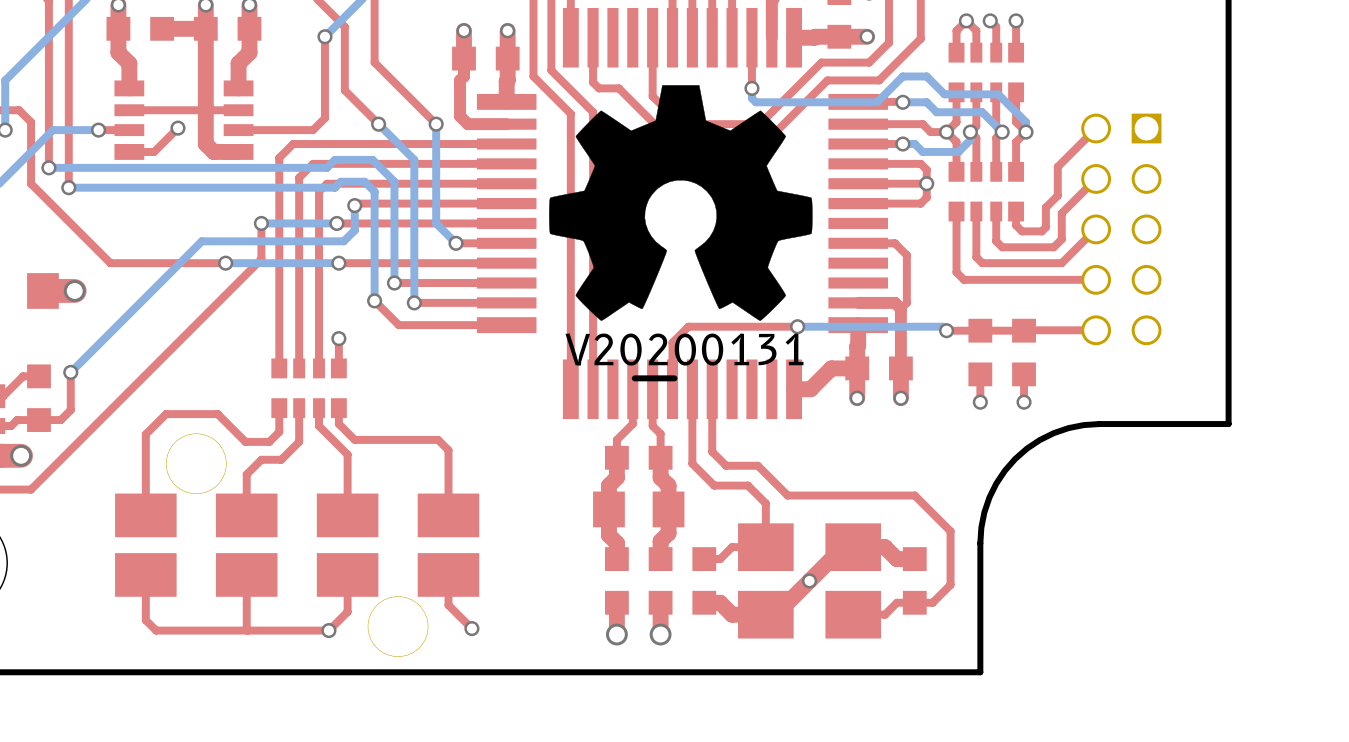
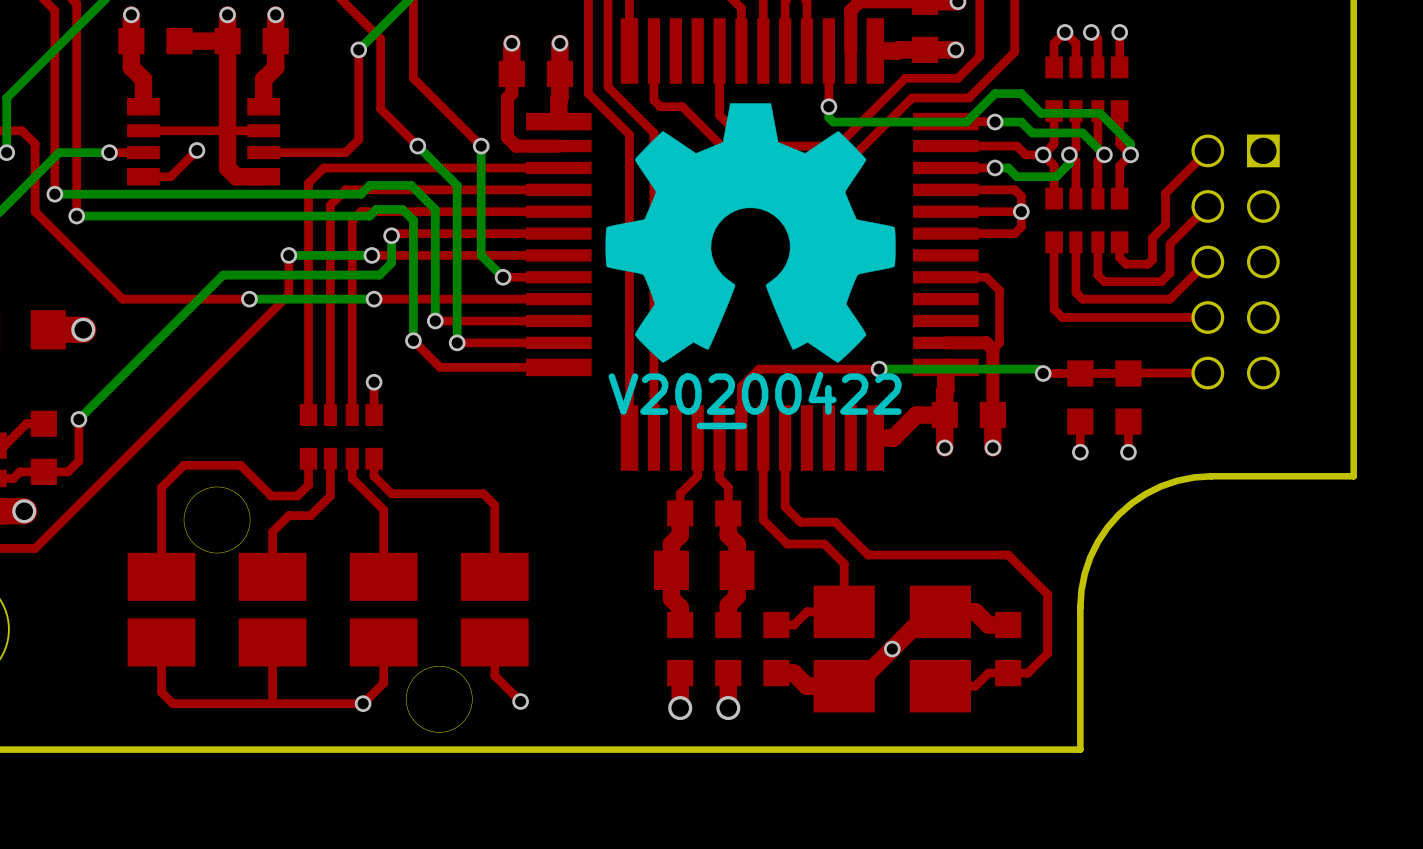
drawing shape: [565, 333, 804, 382] -> [608, 371, 902, 430]

